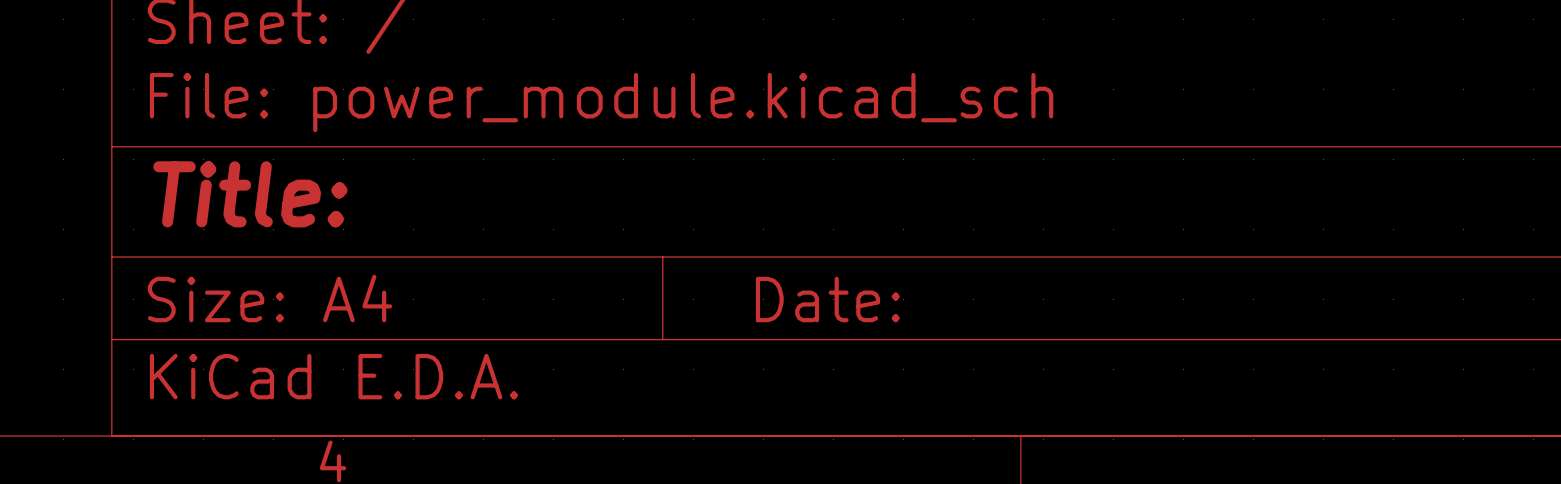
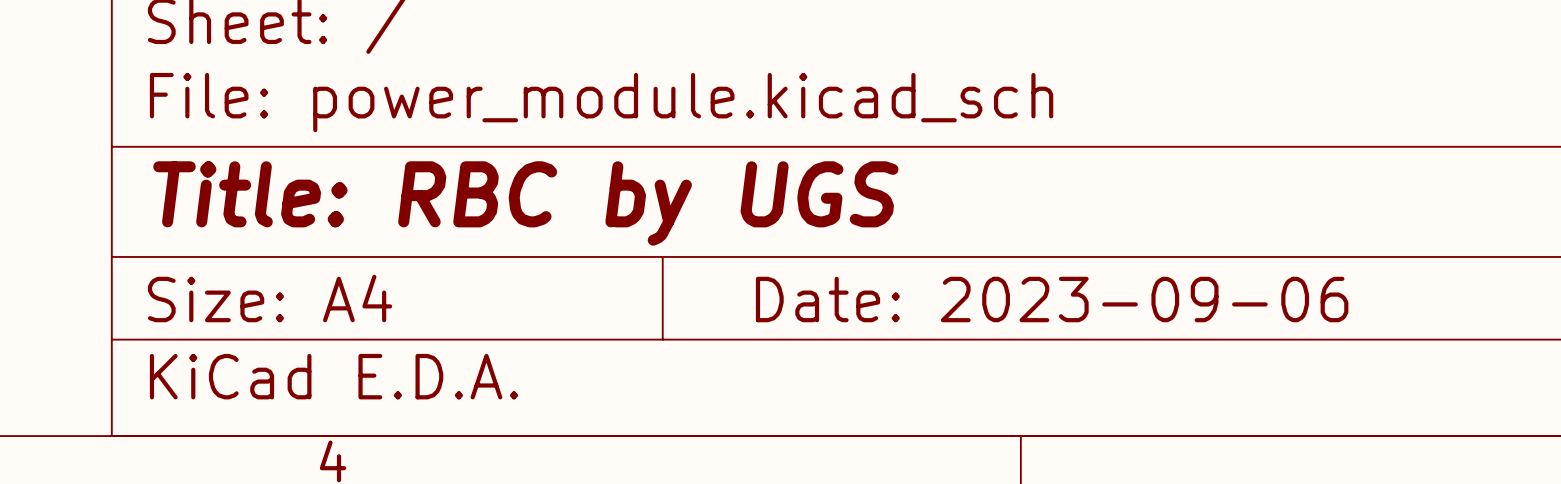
title block: Title: (250, 194) -> Title: RBC by UGS (525, 203)
title block: Date: (827, 299) -> Date: 2023-09-06 (1052, 299)

